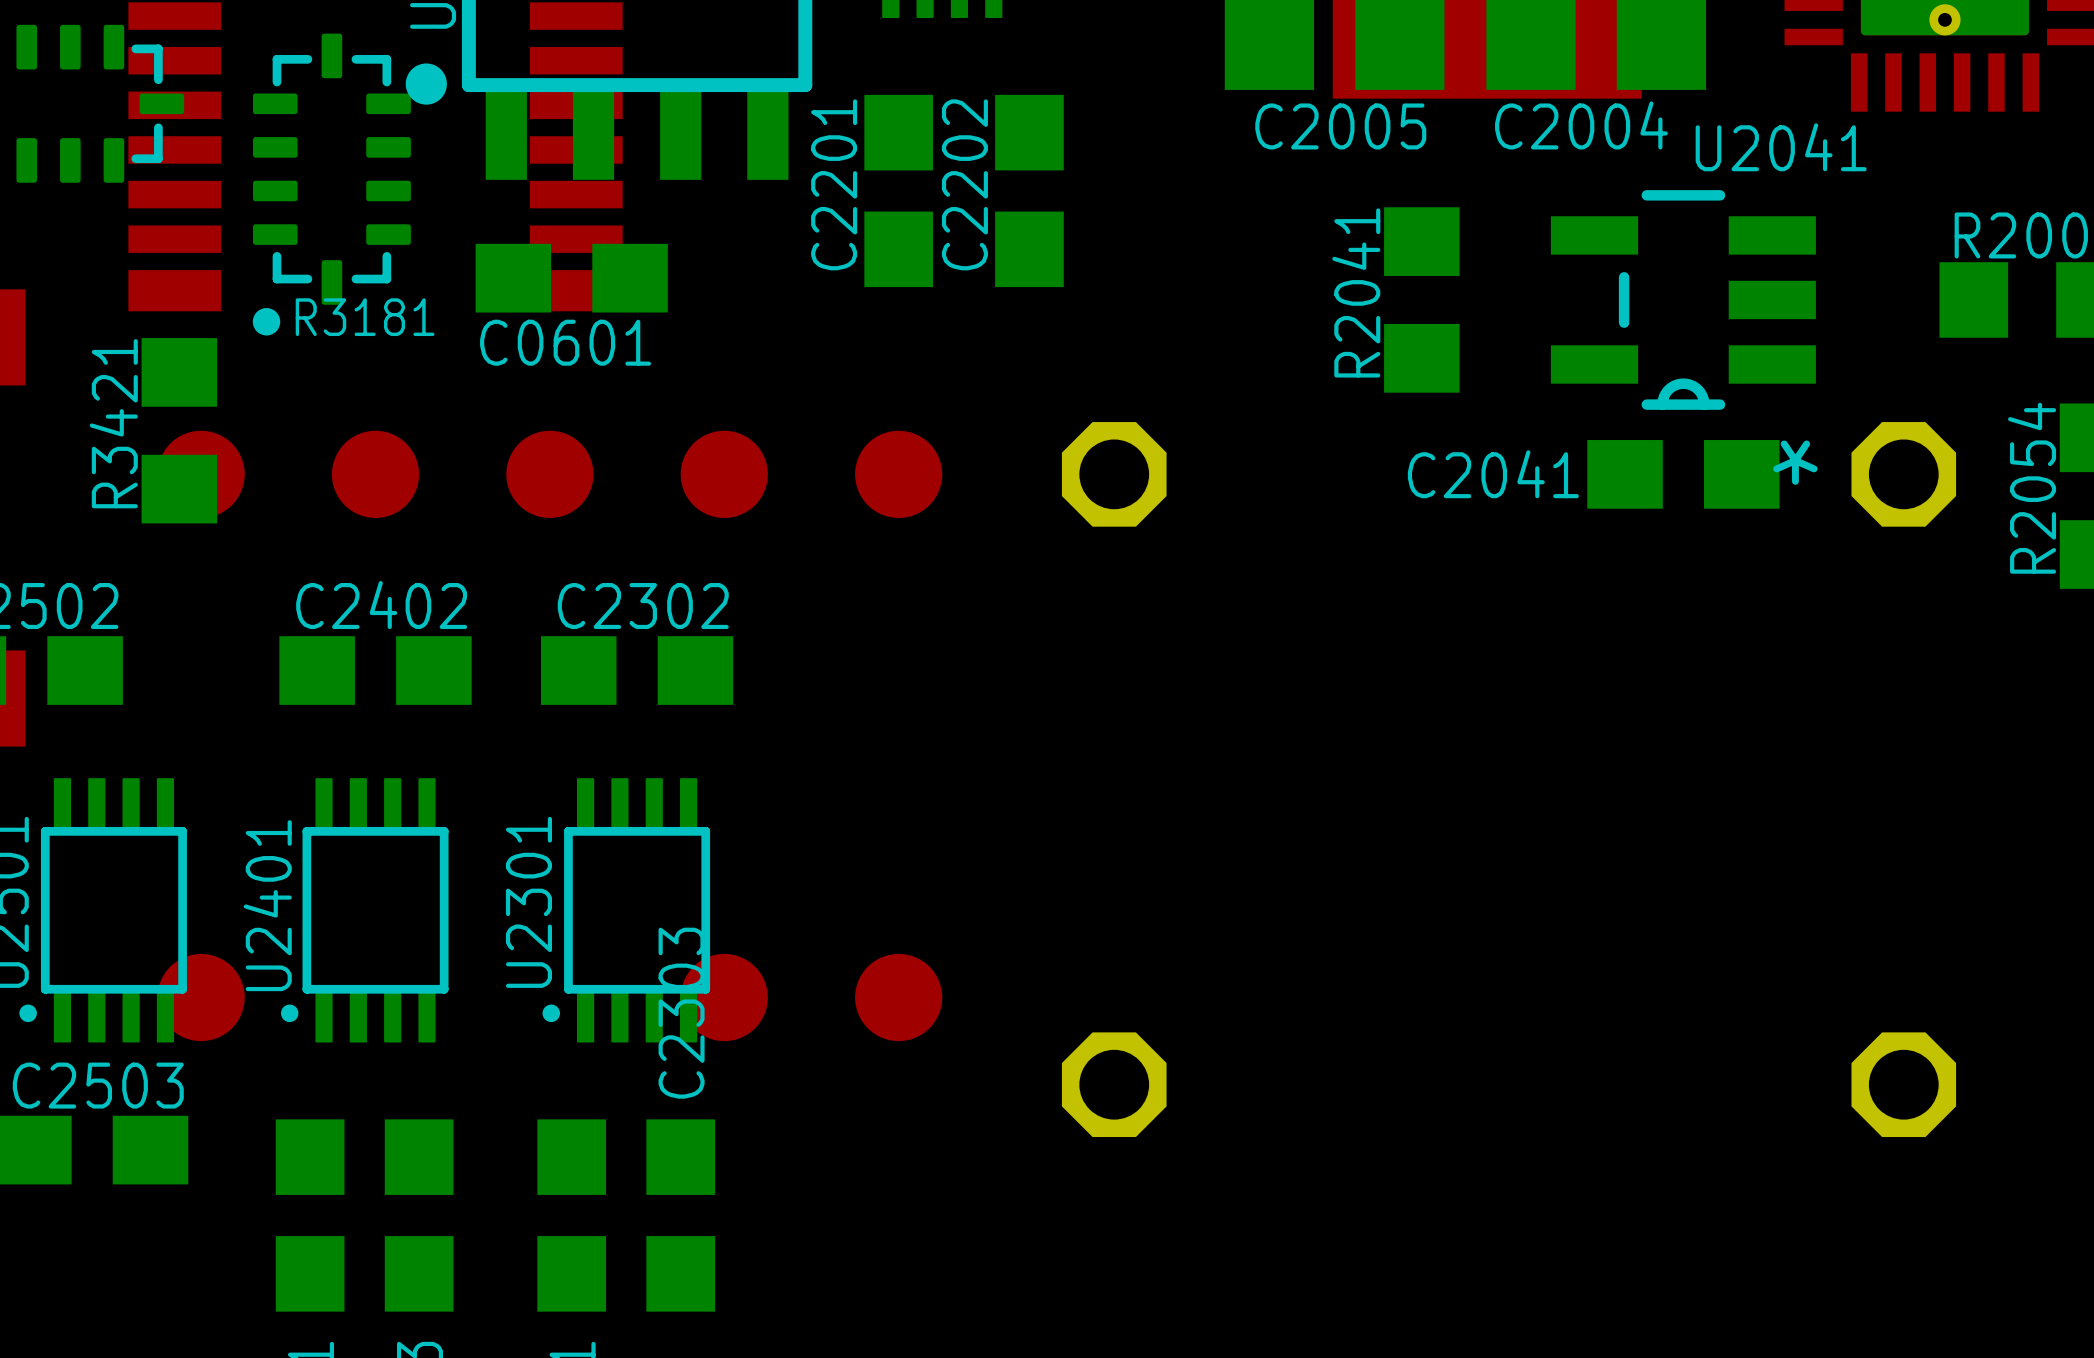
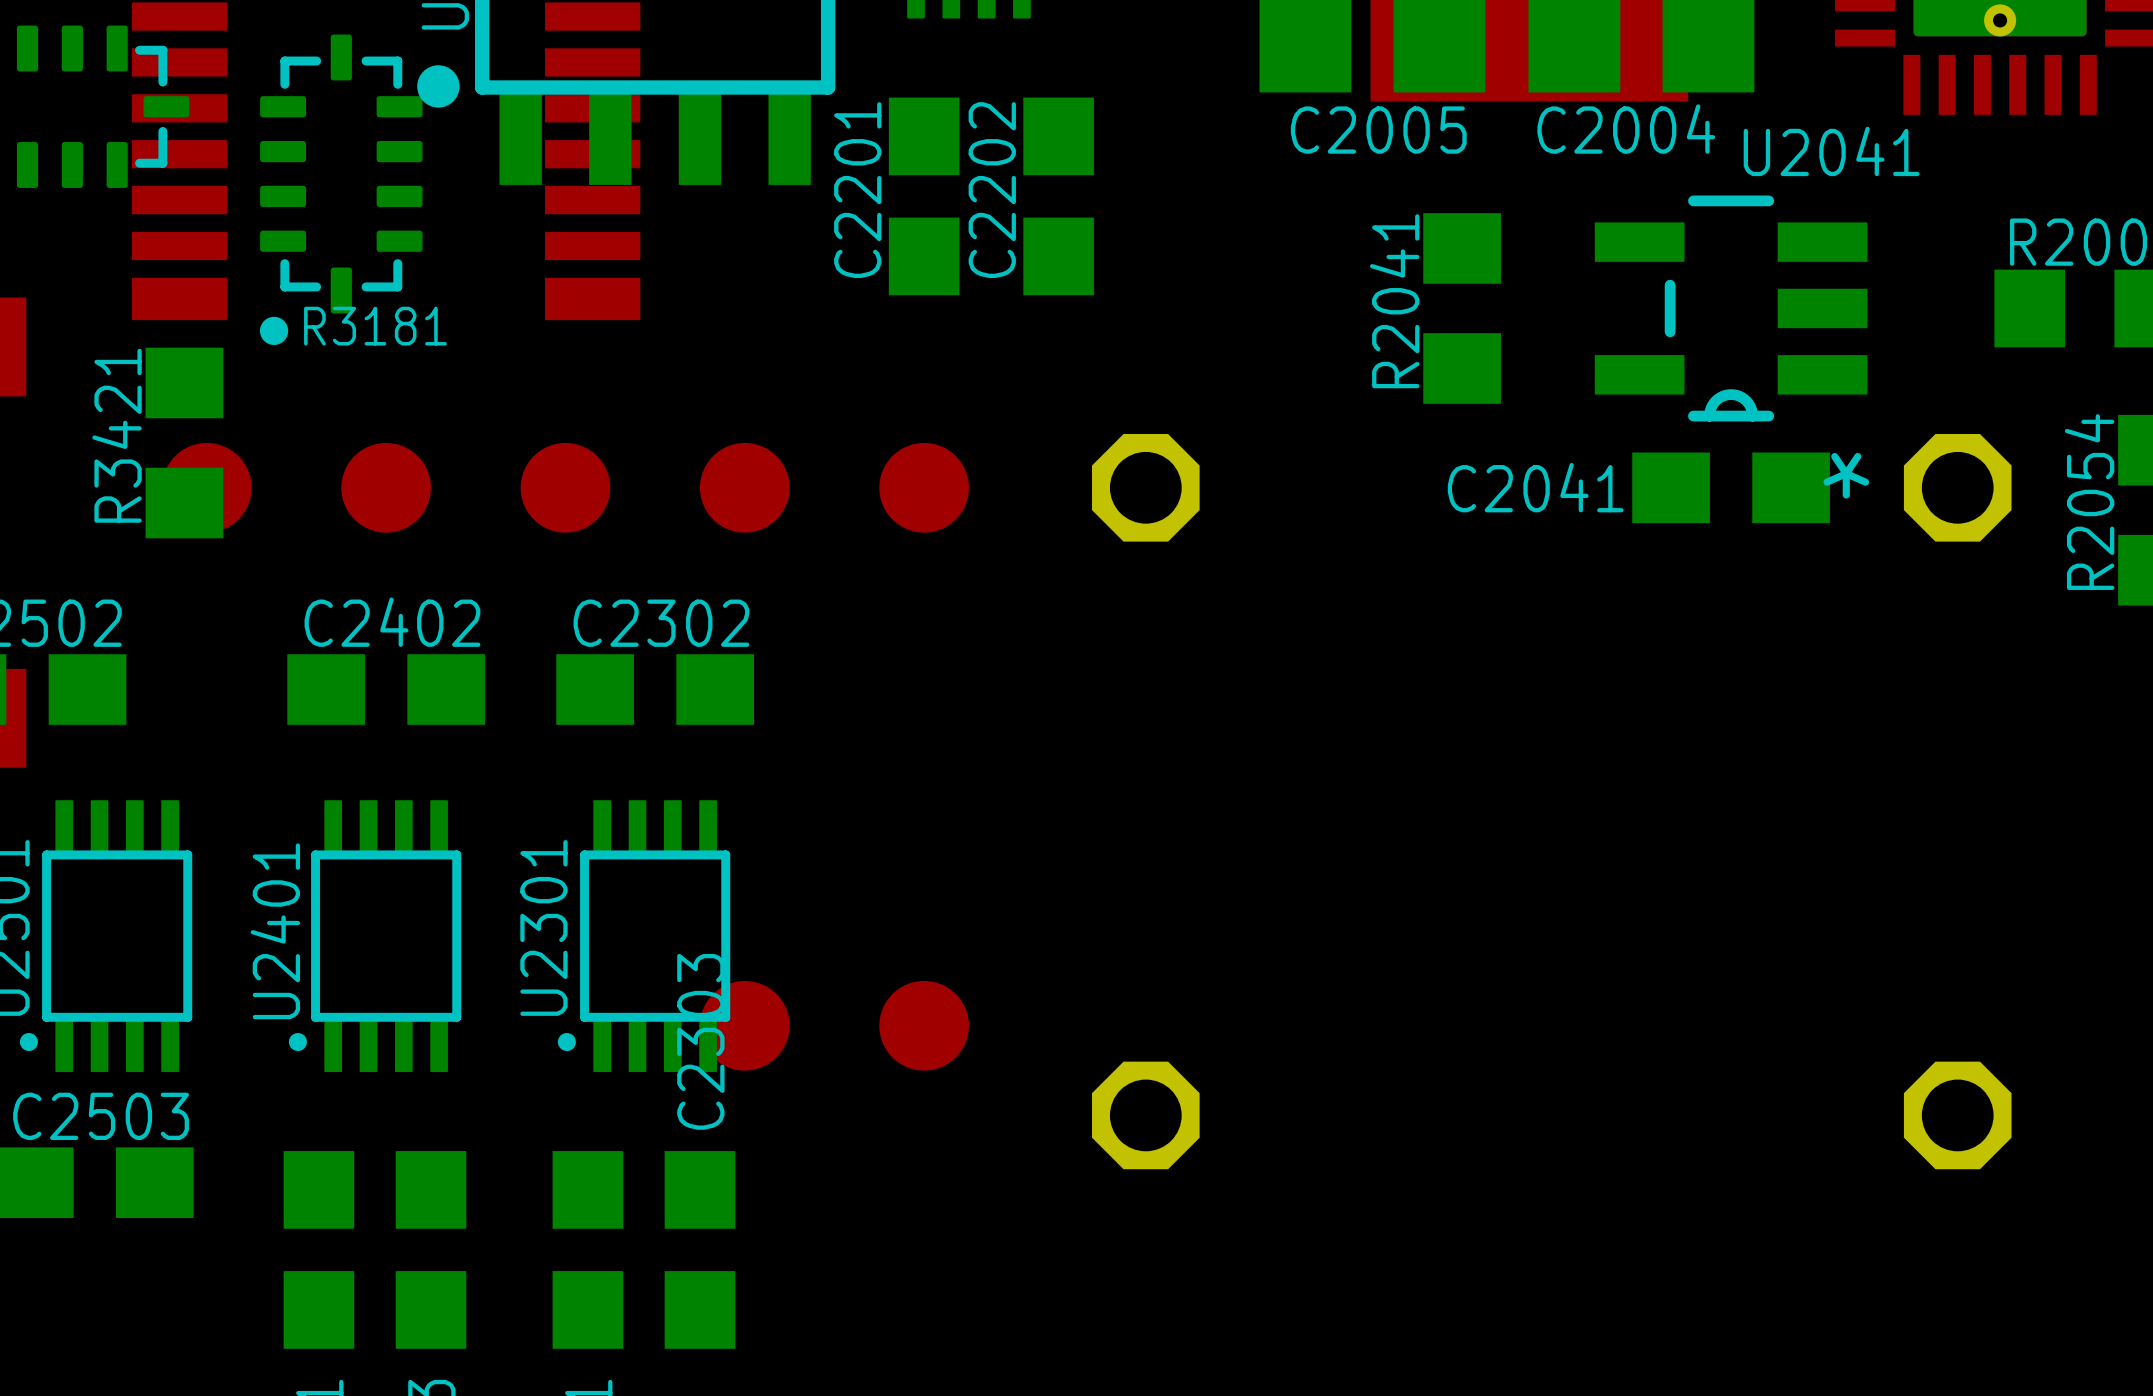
C0601: (571, 278) -> none
part: (201, 997) -> none

